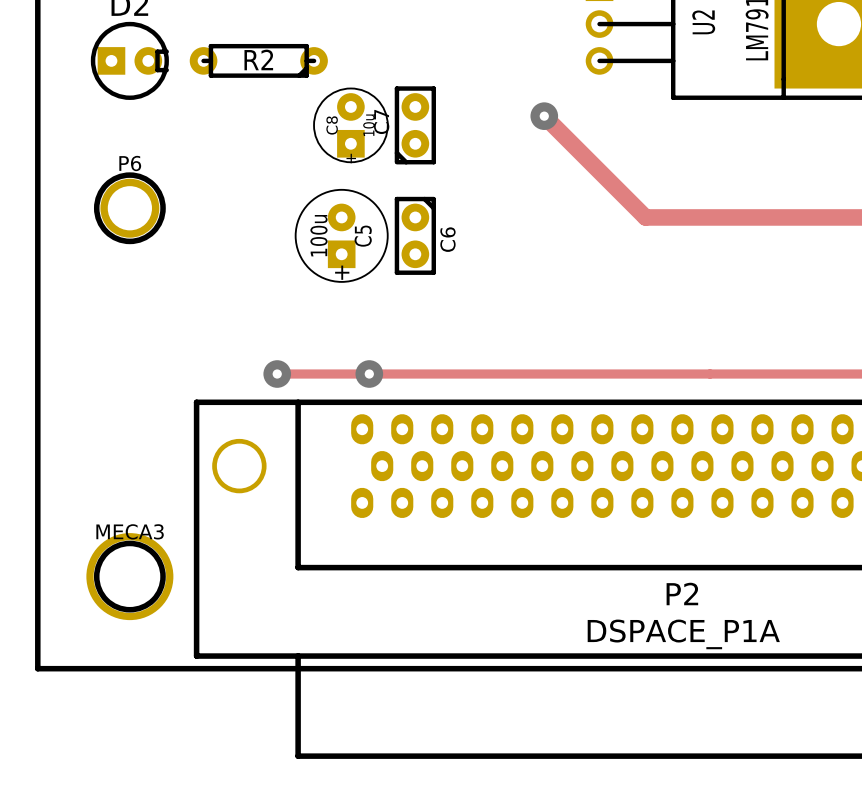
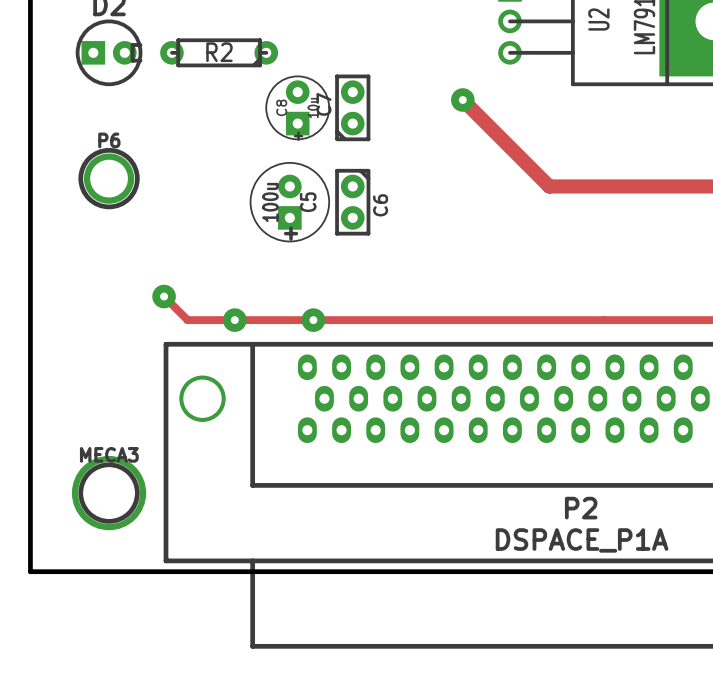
track: none -> (164, 296) (187, 320) (234, 320)
via: none -> (164, 296)

